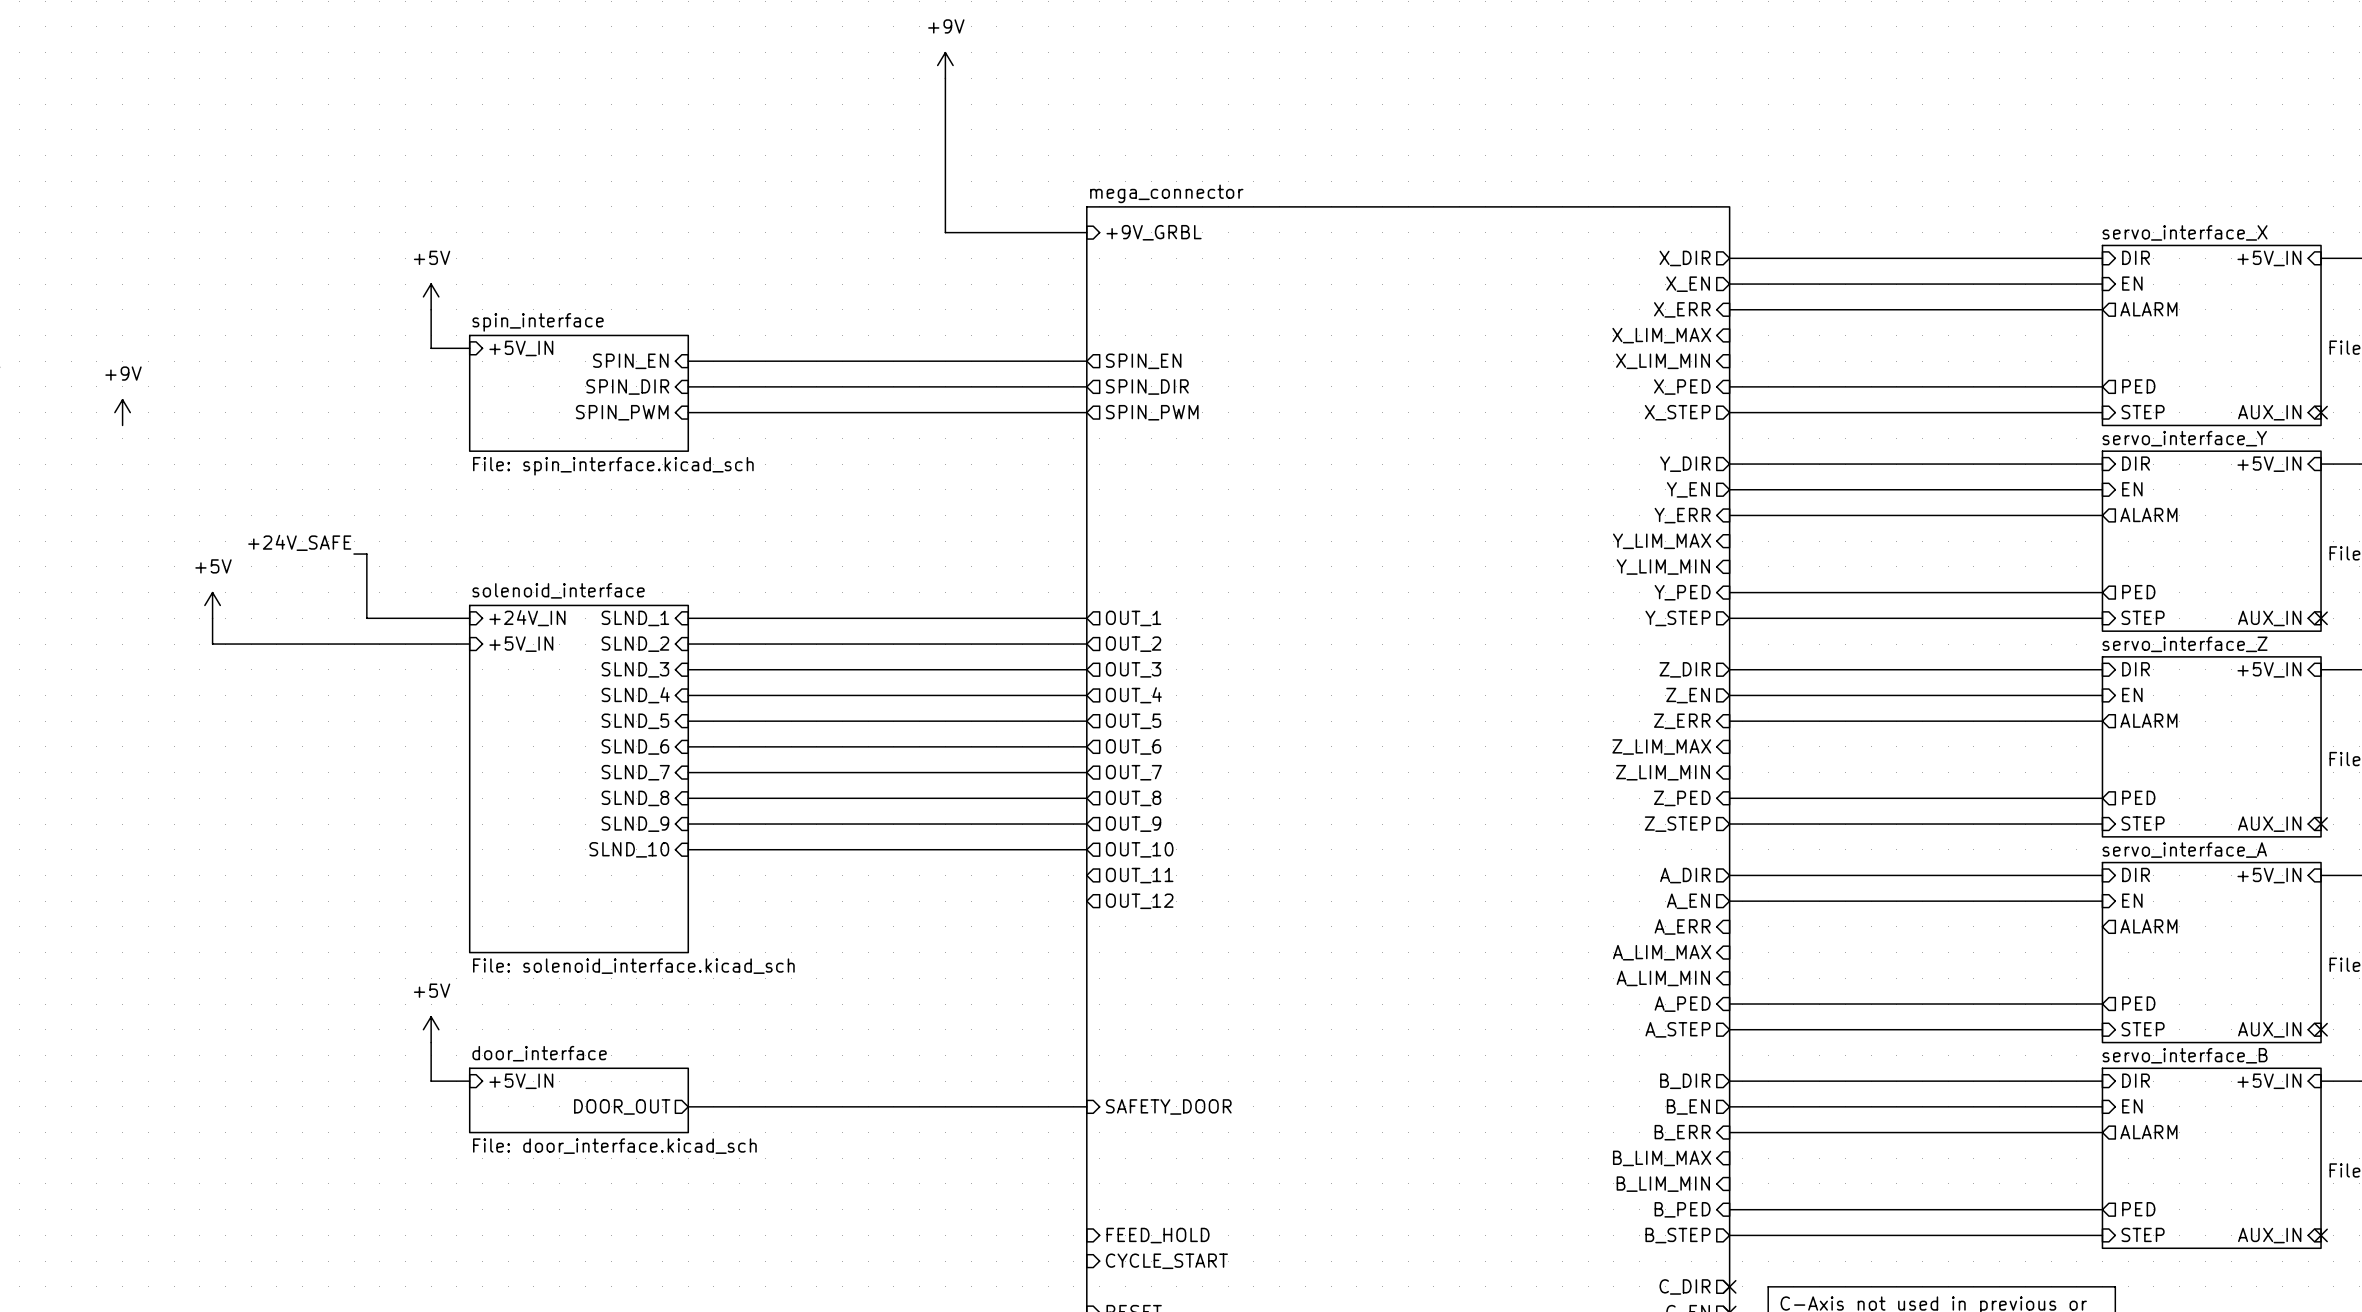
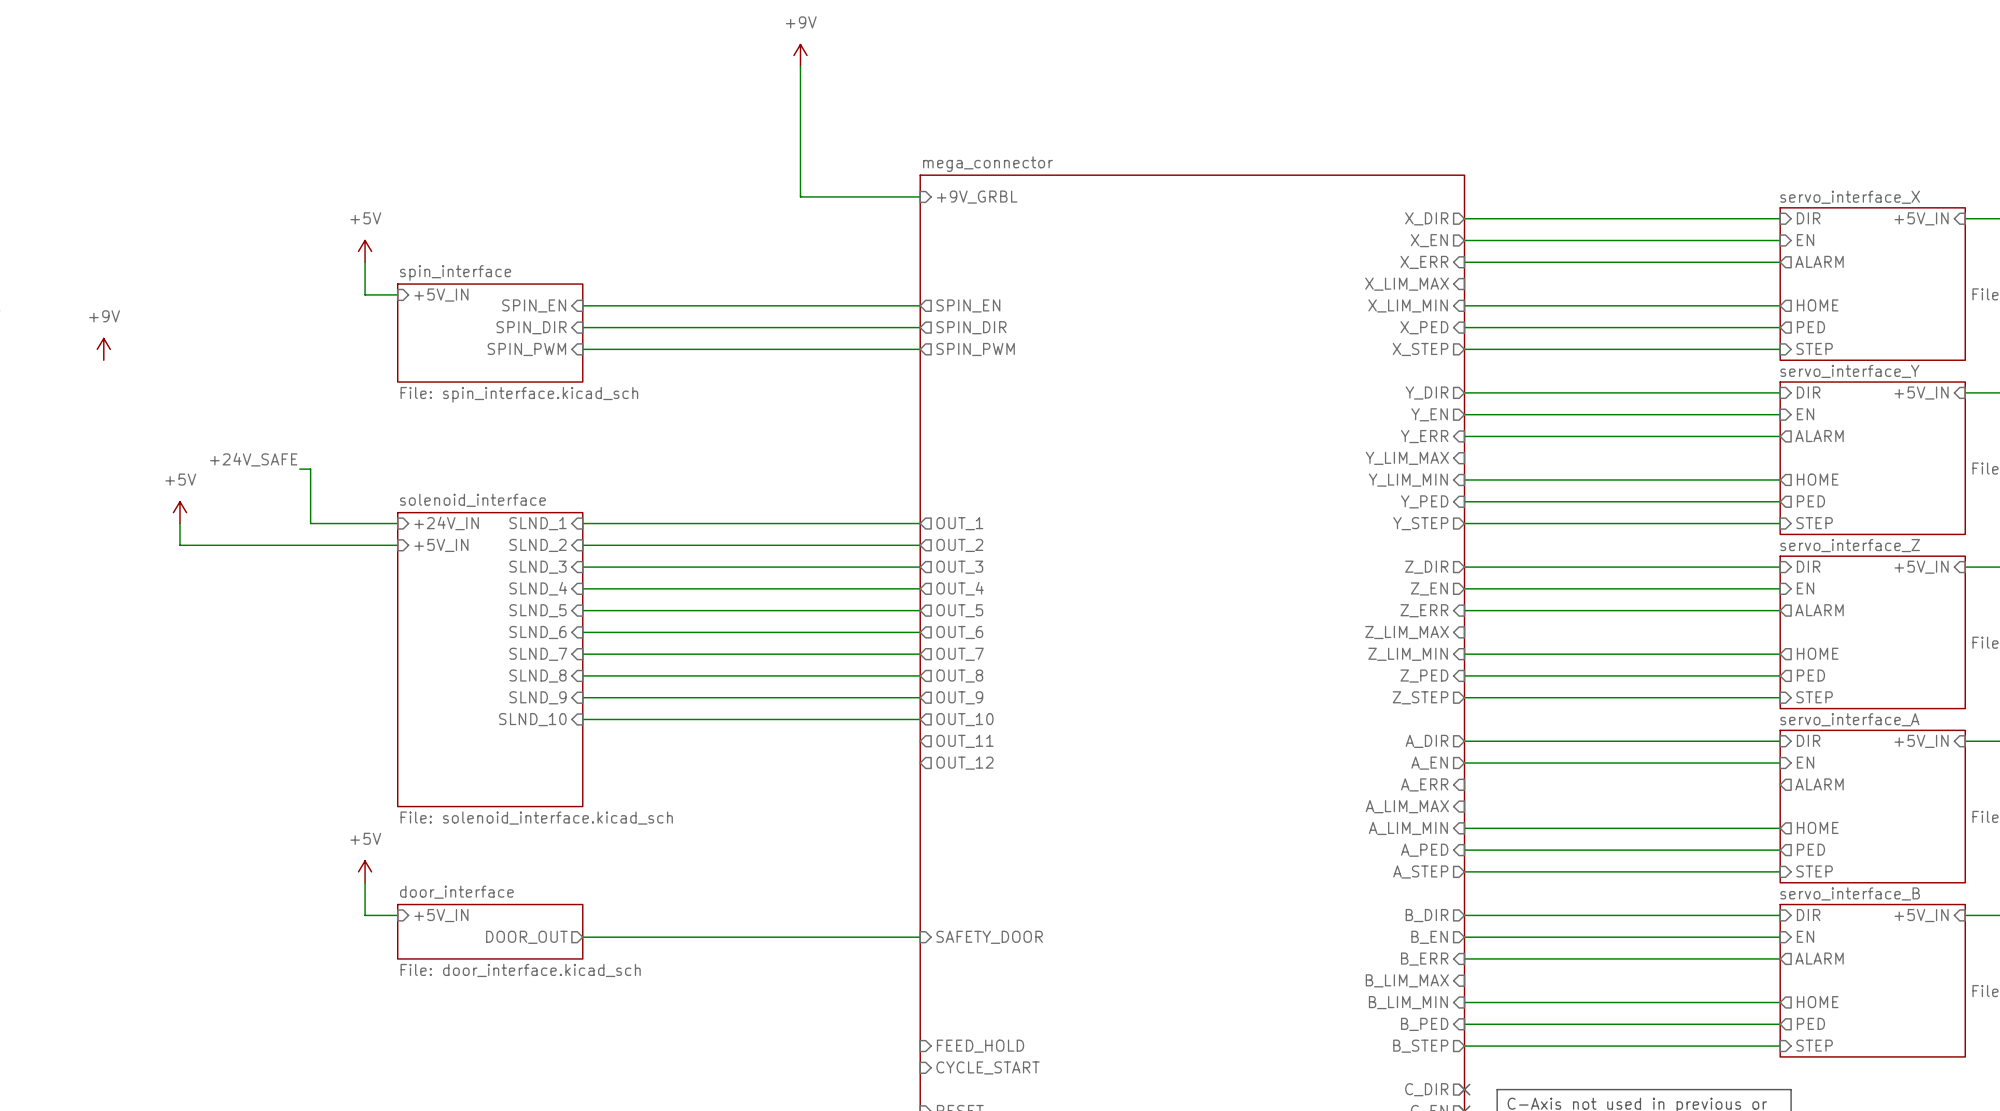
sheet pin: none -> HOME (1817, 305)
wire: none -> (1464, 305) (1780, 305)
sheet pin: AUX_IN (2269, 412) -> none
no-connect mark: (2321, 412) -> none
wire: none -> (1464, 479) (1780, 479)
sheet pin: none -> HOME (1817, 479)
sheet pin: AUX_IN (2269, 618) -> none
no-connect mark: (2321, 618) -> none
wire: none -> (1464, 654) (1780, 654)
sheet pin: none -> HOME (1817, 653)
sheet pin: AUX_IN (2269, 824) -> none
no-connect mark: (2321, 824) -> none
sheet pin: none -> HOME (1817, 827)
wire: none -> (1464, 828) (1780, 828)
sheet pin: AUX_IN (2269, 1029) -> none
no-connect mark: (2321, 1029) -> none
wire: none -> (1464, 1002) (1780, 1002)
sheet pin: none -> HOME (1817, 1002)
sheet pin: AUX_IN (2269, 1235) -> none
no-connect mark: (2321, 1235) -> none

